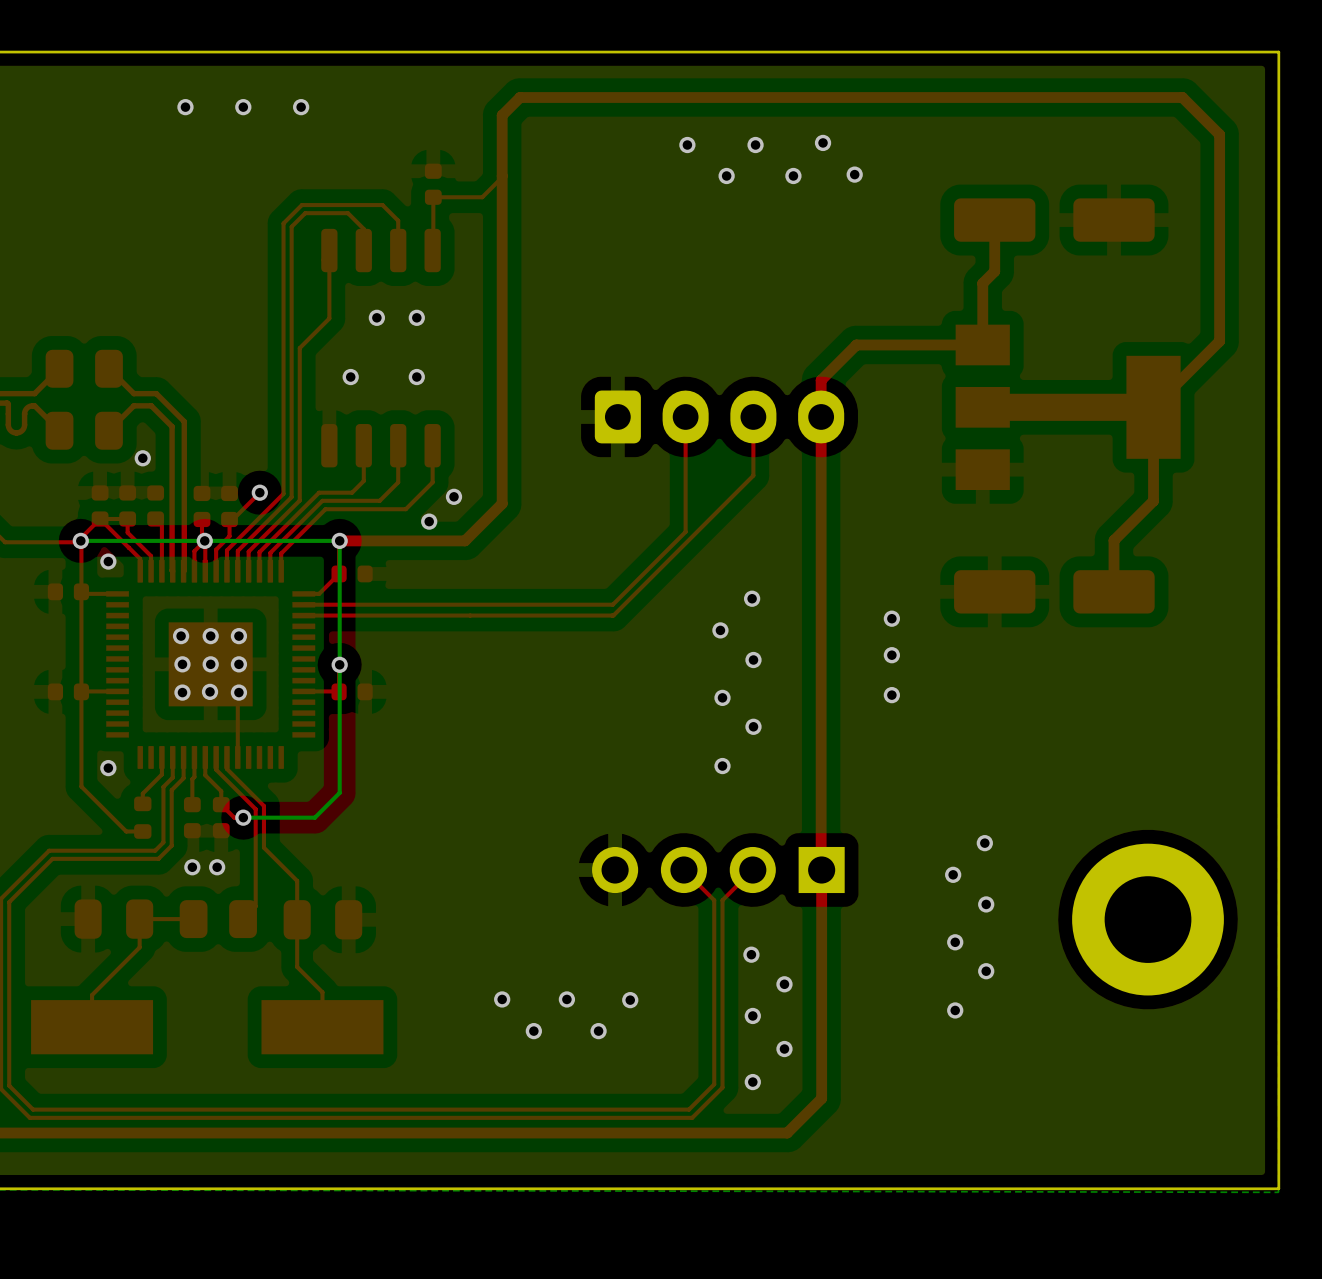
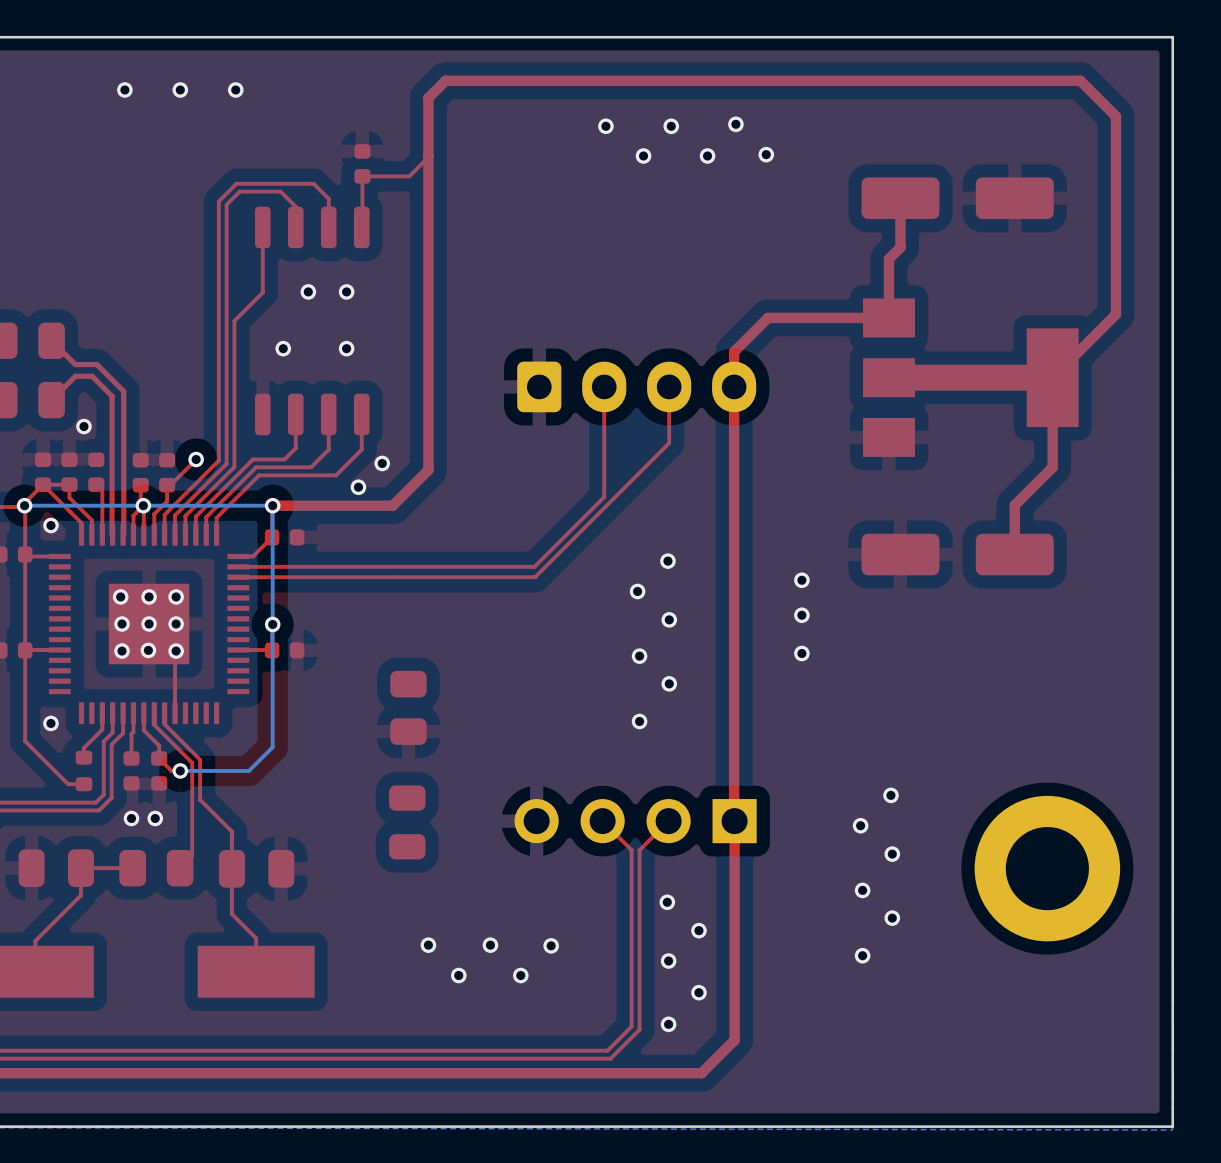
part: none -> (408, 707)
part: none -> (407, 822)

